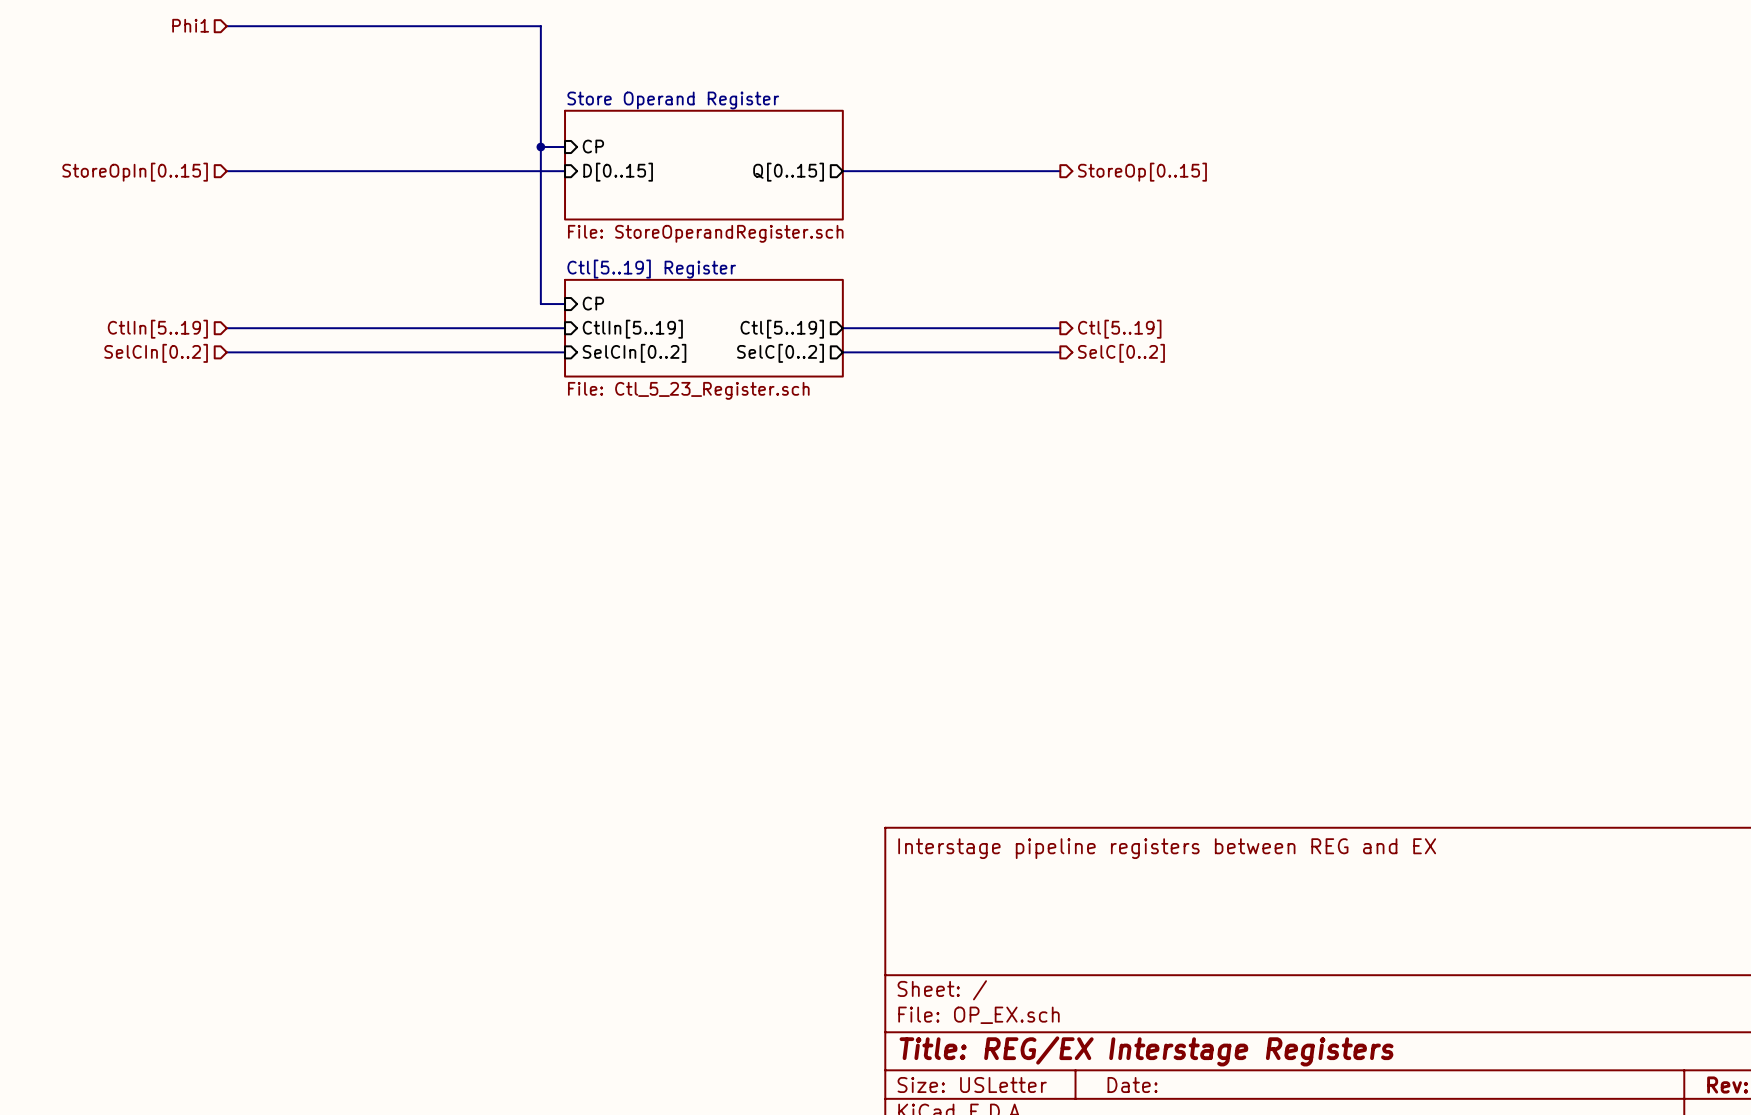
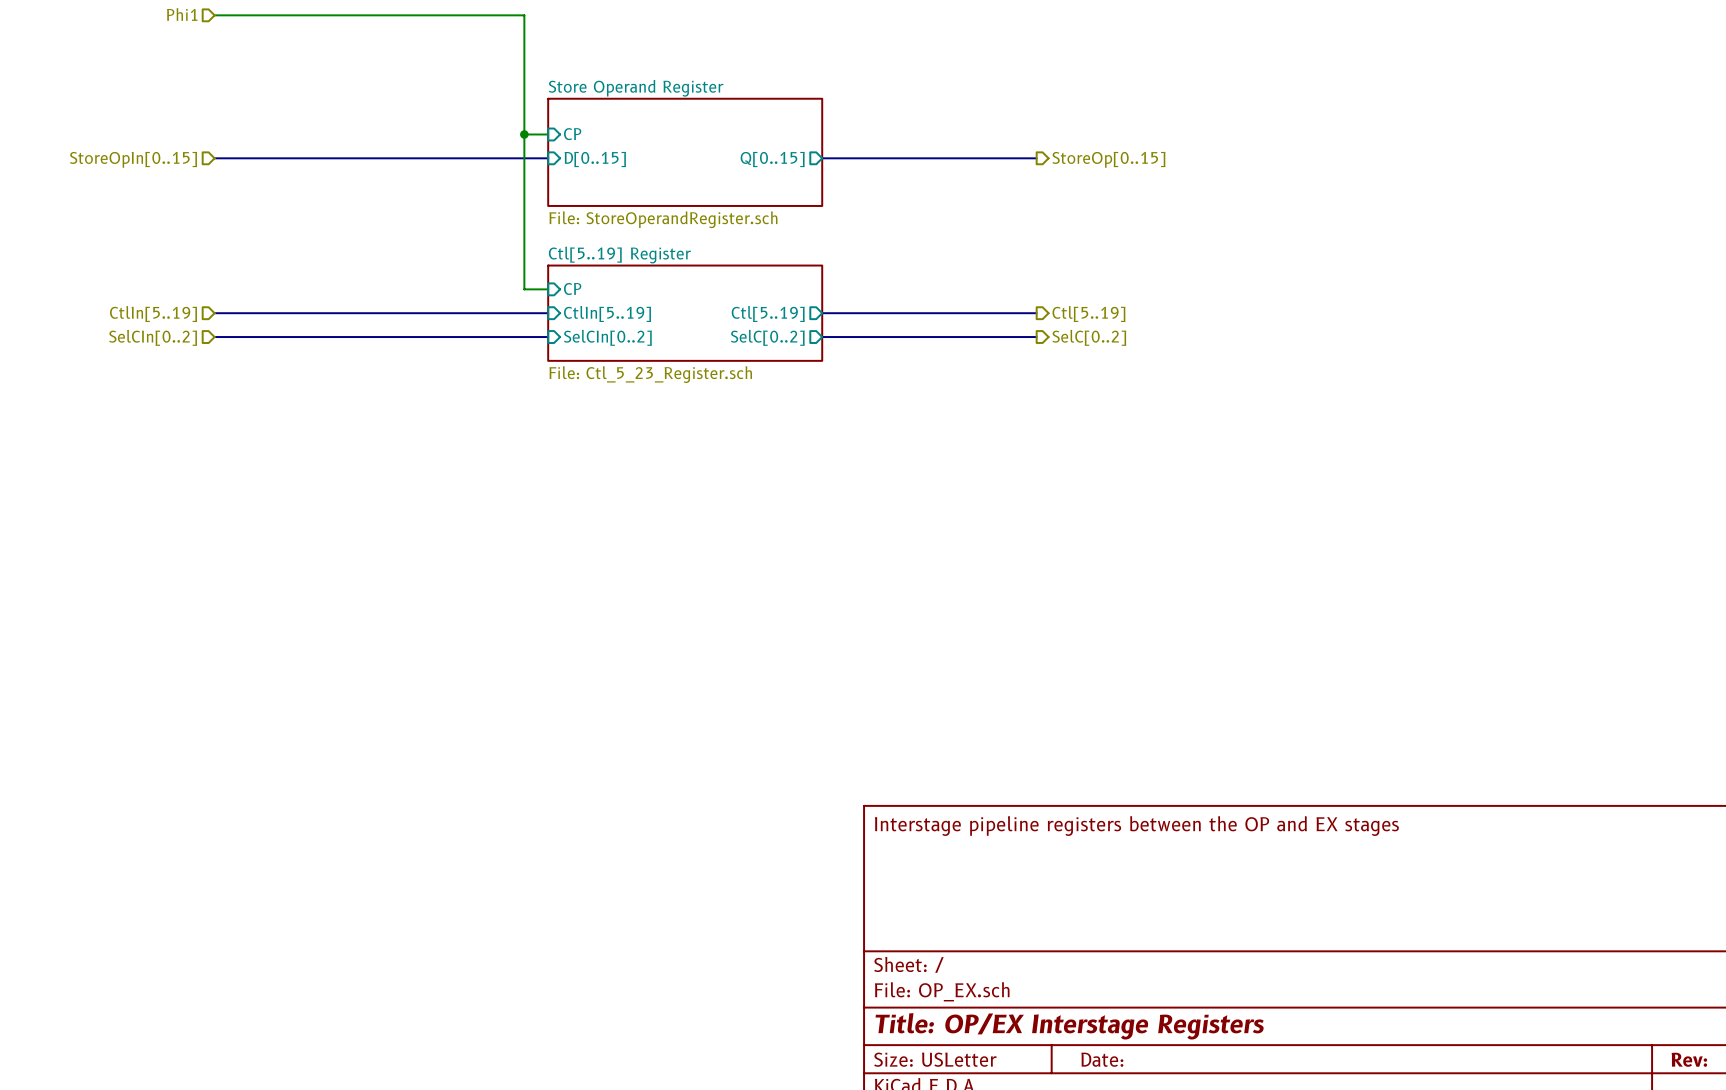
title block: Interstage pipeline registers between REG and EX (1167, 848) -> Interstage pipeline registers between the OP and EX stages (1136, 826)
title block: Title: REG/EX Interstage Registers (1146, 1051) -> Title: OP/EX Interstage Registers (1069, 1026)

